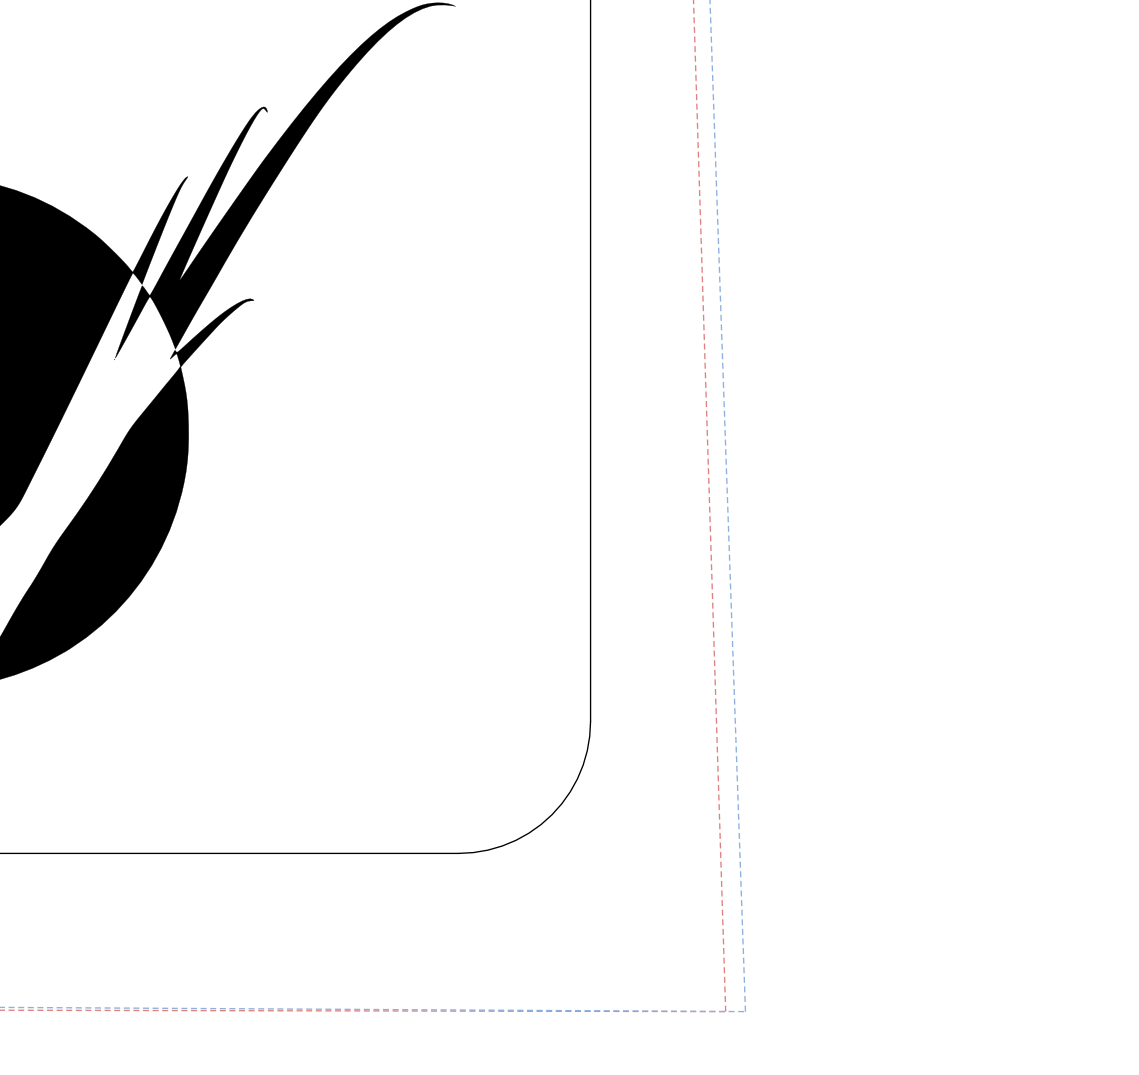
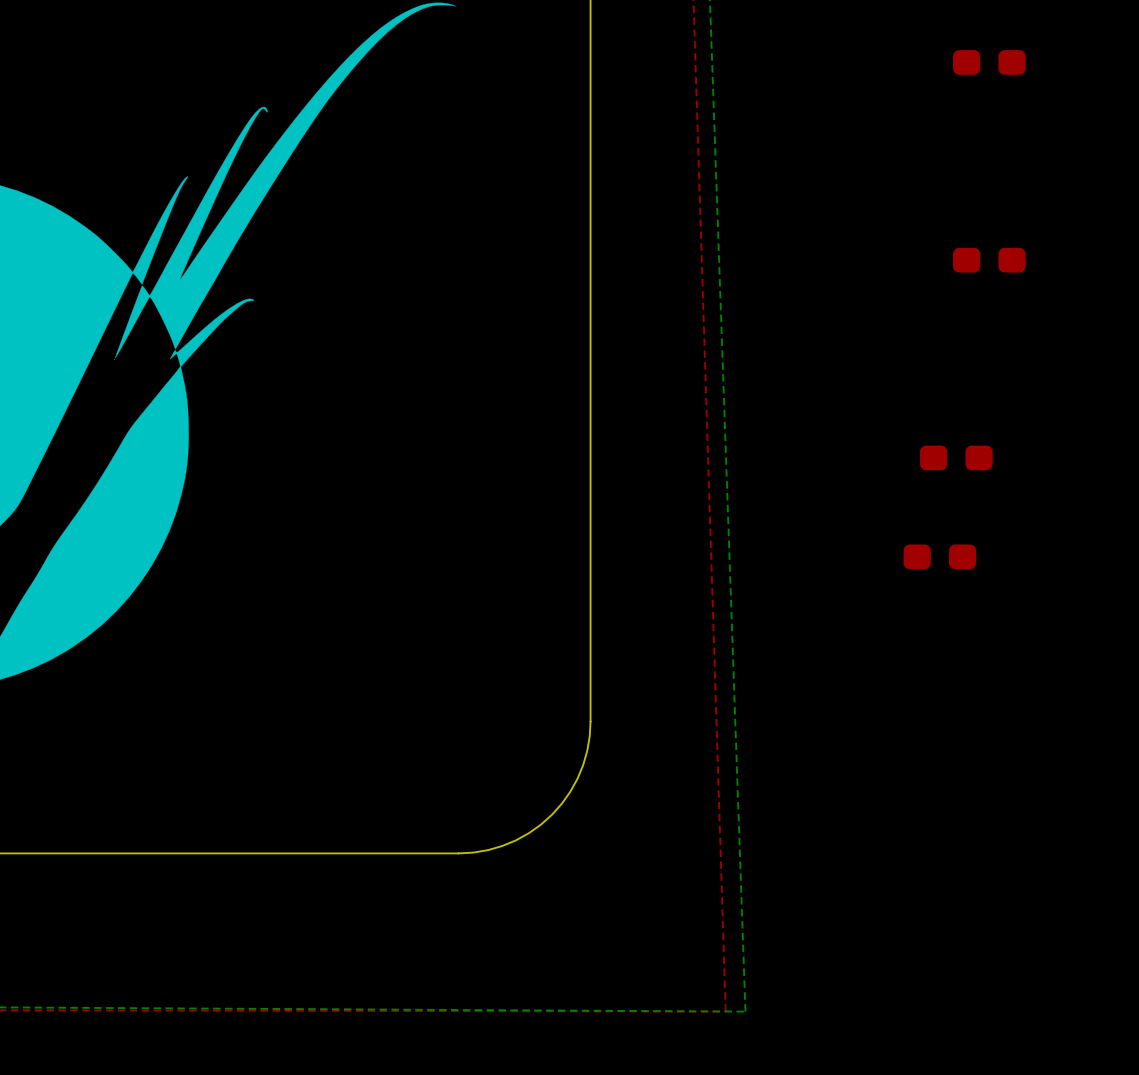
part: none -> (989, 62)
part: none -> (989, 260)
part: none -> (956, 457)
part: none -> (939, 556)

